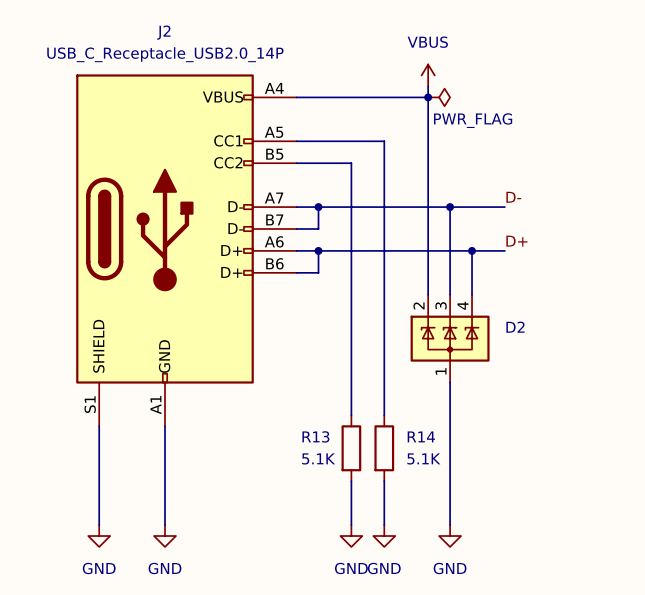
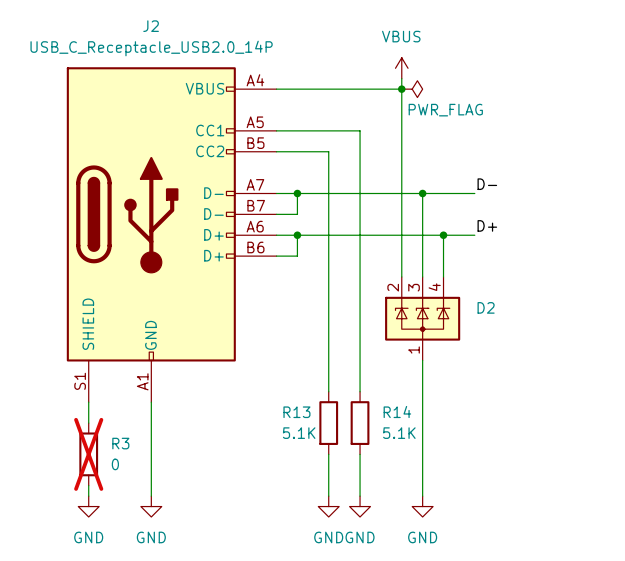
R3: none -> 0 (88, 454)

